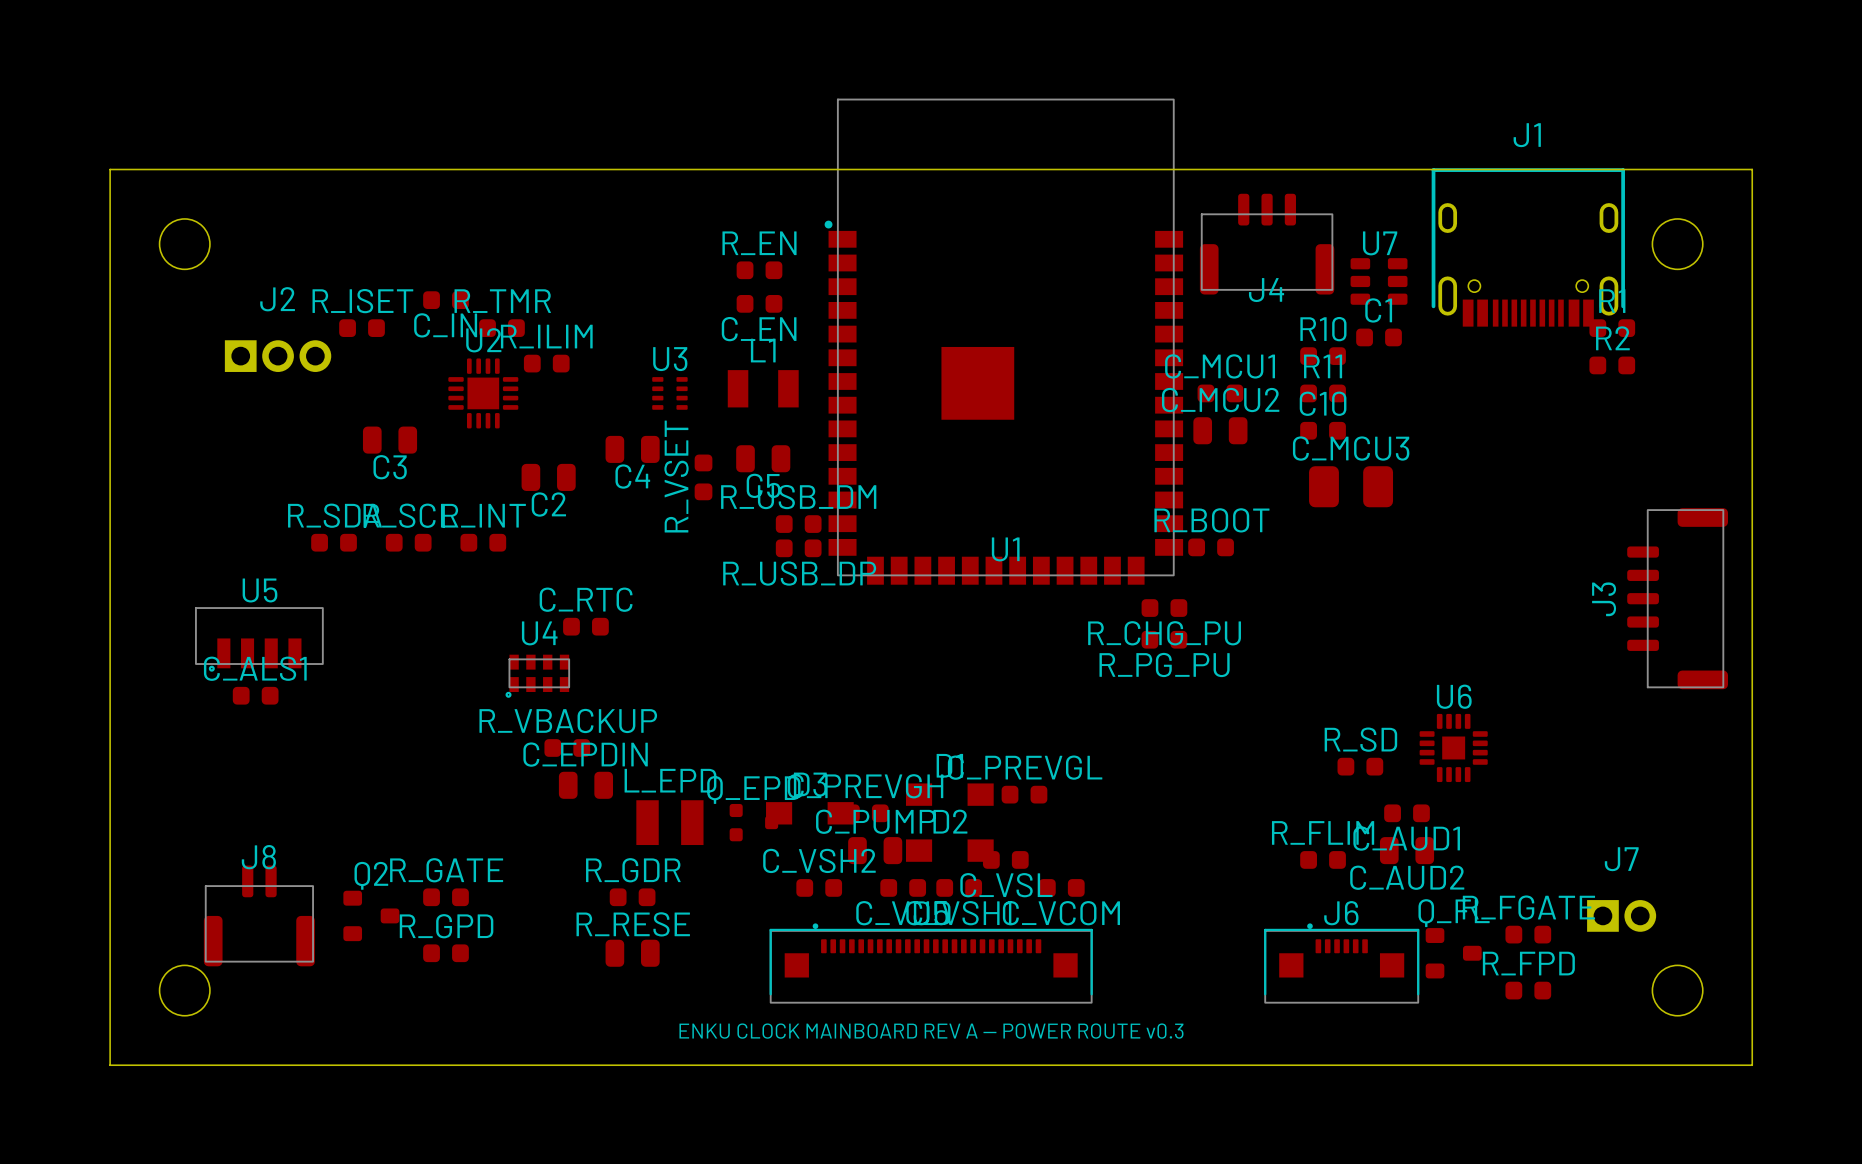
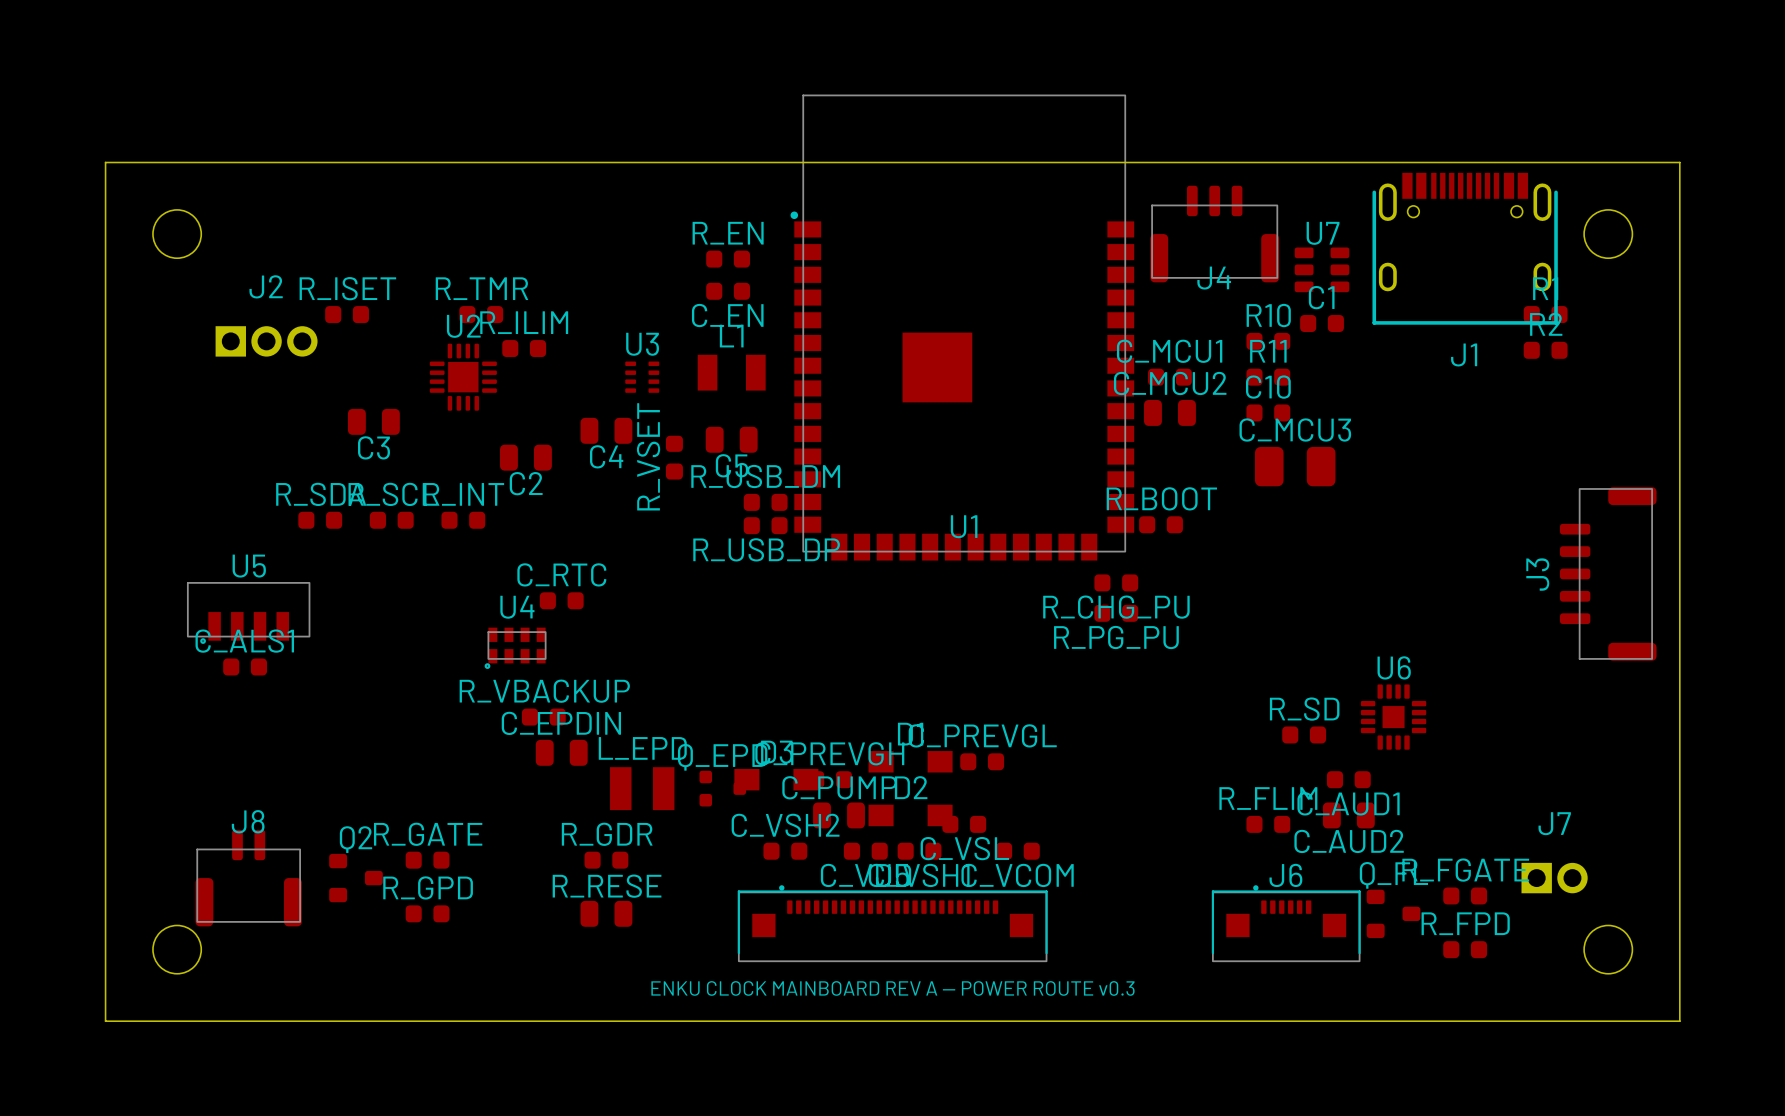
J1 rotation: 0° (1528, 247) -> 180° (1465, 248)
C_IN: (446, 300) -> none

